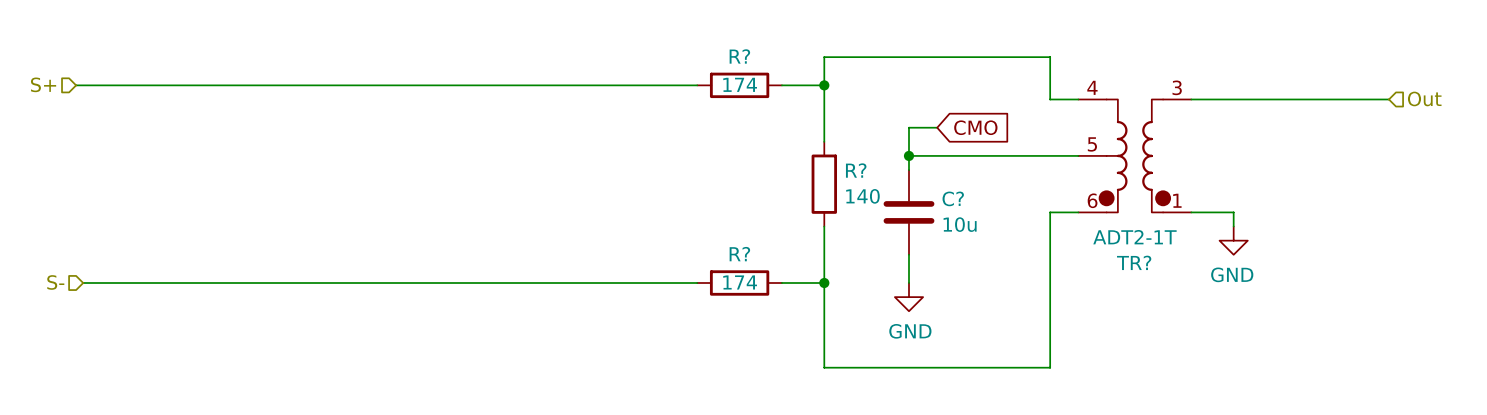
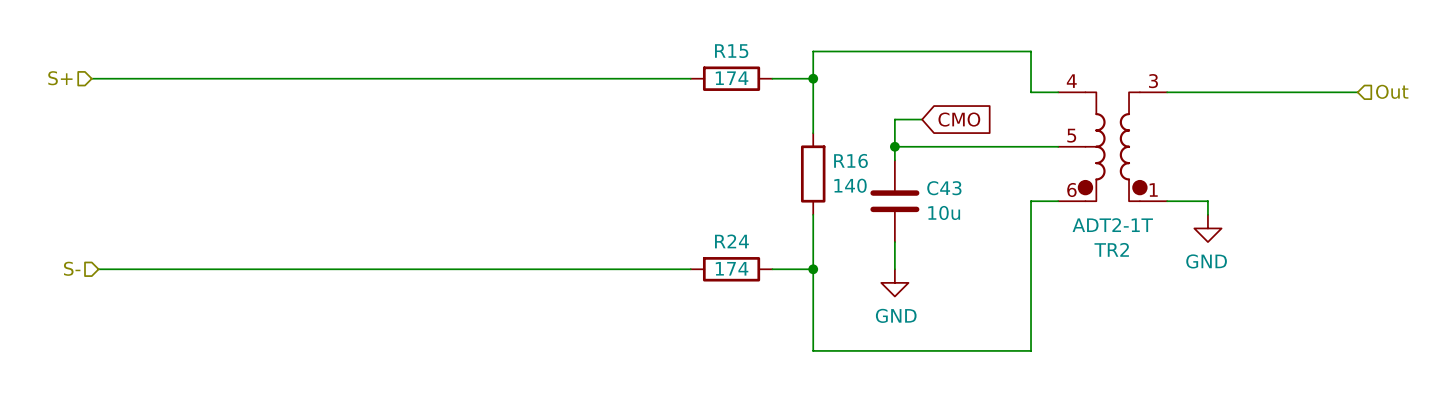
R? name: R? (739, 56) -> R15 (731, 51)
R? name: R? (856, 170) -> R16 (850, 160)
C? name: C? (953, 198) -> C43 (944, 188)
R? name: R? (739, 254) -> R24 (731, 241)
TR? name: TR? (1134, 262) -> TR2 (1111, 249)

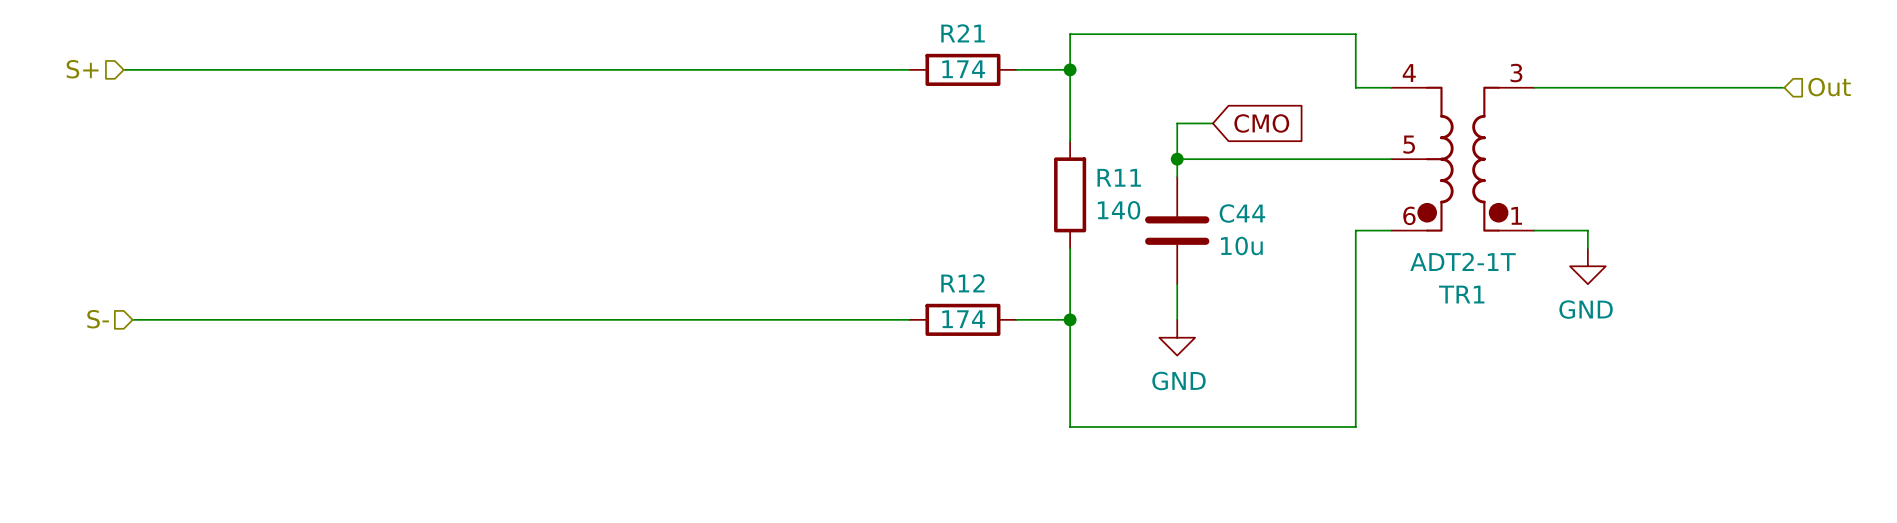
R15 name: R15 (731, 51) -> R21 (963, 33)
R16 name: R16 (850, 160) -> R11 (1119, 177)
C43 name: C43 (944, 188) -> C44 (1242, 213)
R24 name: R24 (731, 241) -> R12 (962, 283)
TR2 name: TR2 (1111, 249) -> TR1 (1461, 294)

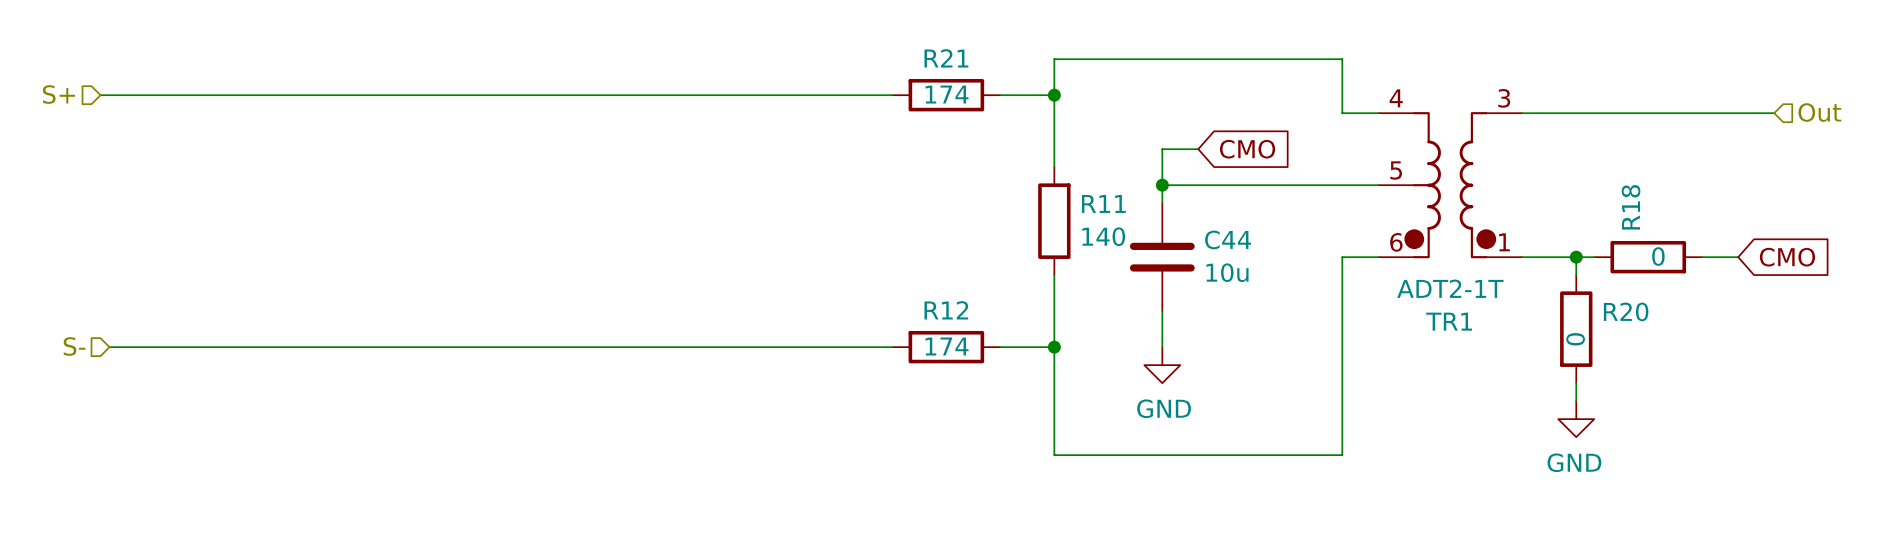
wire: none -> (1576, 257) (1594, 257)
junction: none -> (1576, 257)
R18: none -> 0 (1648, 257)
wire: none -> (1702, 257) (1738, 257)
global label: none -> CMO (1787, 257)
power symbol position: GND (1587, 266) -> GND (1576, 419)
R20: none -> 0 (1576, 329)
wire: none -> (1576, 383) (1576, 401)

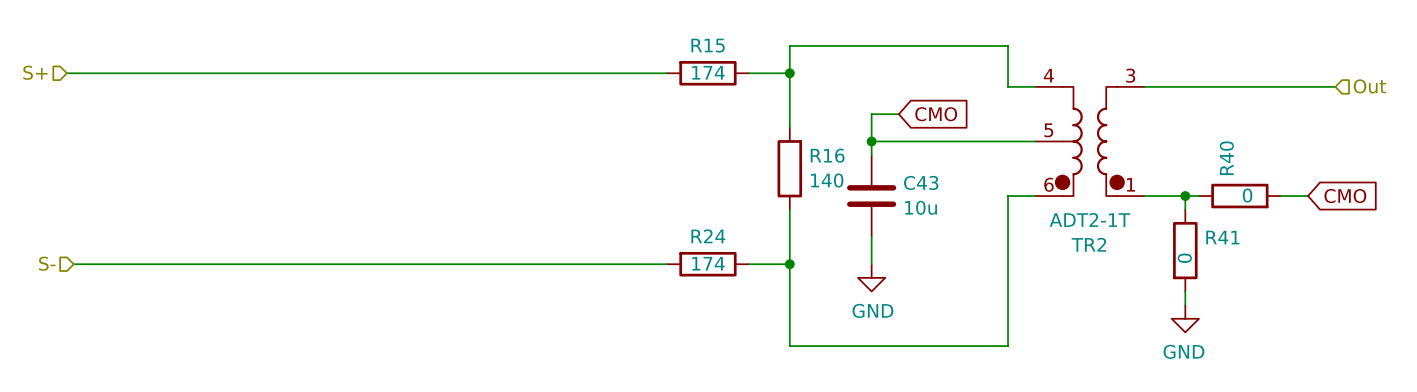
R21 name: R21 (946, 58) -> R15 (708, 45)
R11 name: R11 (1103, 203) -> R16 (827, 155)
R18 name: R18 (1631, 207) -> R40 (1226, 158)
C44 name: C44 (1228, 239) -> C43 (921, 182)
R12 name: R12 (946, 310) -> R24 (708, 236)
R20 name: R20 (1626, 311) -> R41 (1222, 237)
TR1 name: TR1 (1449, 321) -> TR2 (1088, 244)

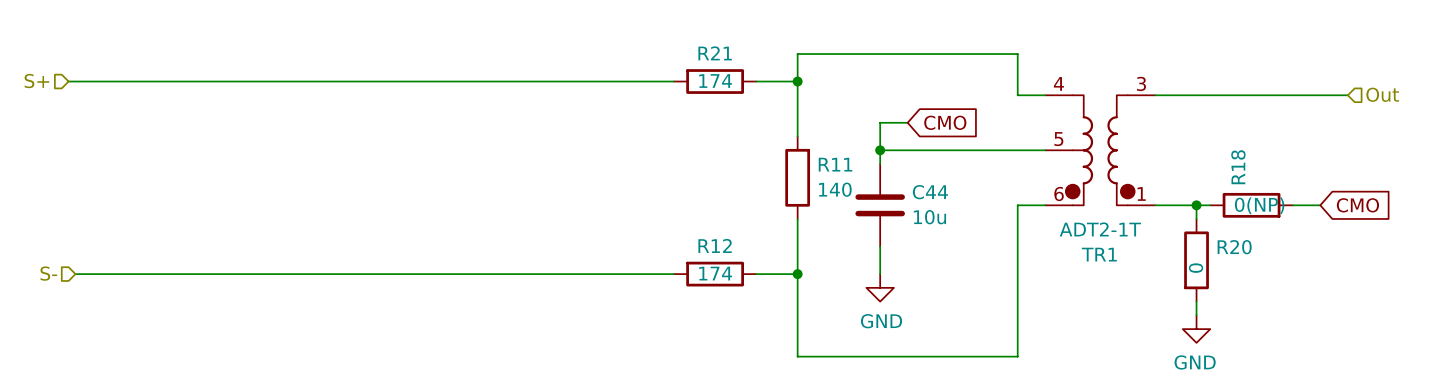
R15 name: R15 (708, 45) -> R21 (715, 53)
R16 name: R16 (827, 155) -> R11 (835, 164)
R40 name: R40 (1226, 158) -> R18 (1238, 167)
C43 name: C43 (921, 182) -> C44 (930, 192)
R40 value: 0 (1247, 195) -> 0(NP) (1259, 205)
R24 name: R24 (708, 236) -> R12 (715, 245)
R41 name: R41 (1222, 237) -> R20 (1234, 247)
TR2 name: TR2 (1088, 244) -> TR1 (1099, 254)

